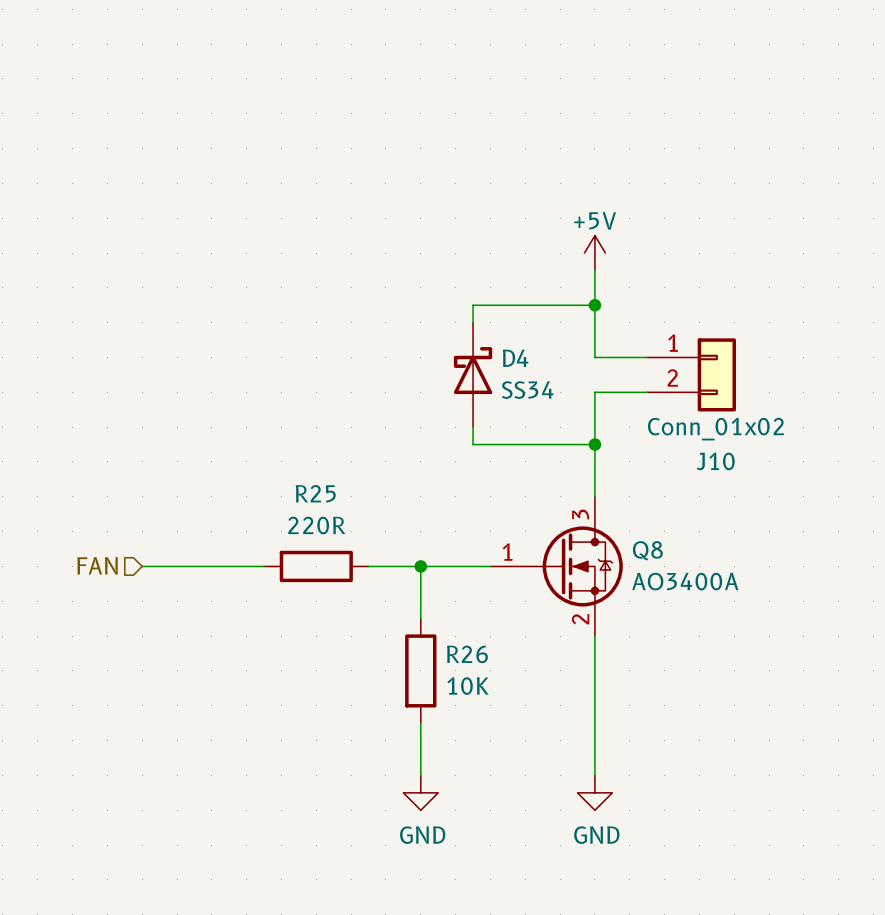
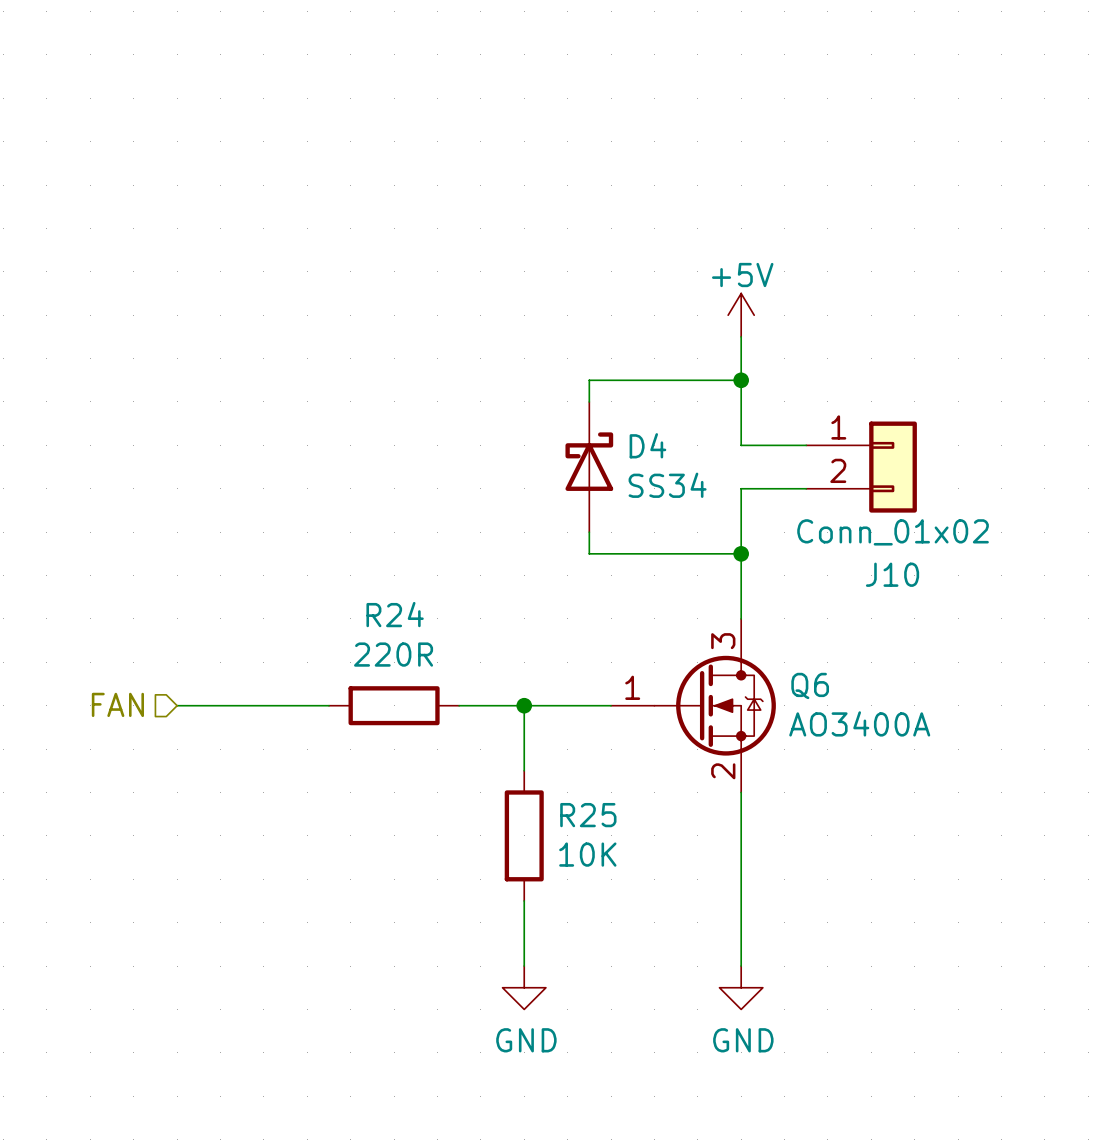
R25 name: R25 (315, 493) -> R24 (395, 614)
Q8 name: Q8 (647, 550) -> Q6 (810, 685)
R26 name: R26 (467, 654) -> R25 (588, 815)

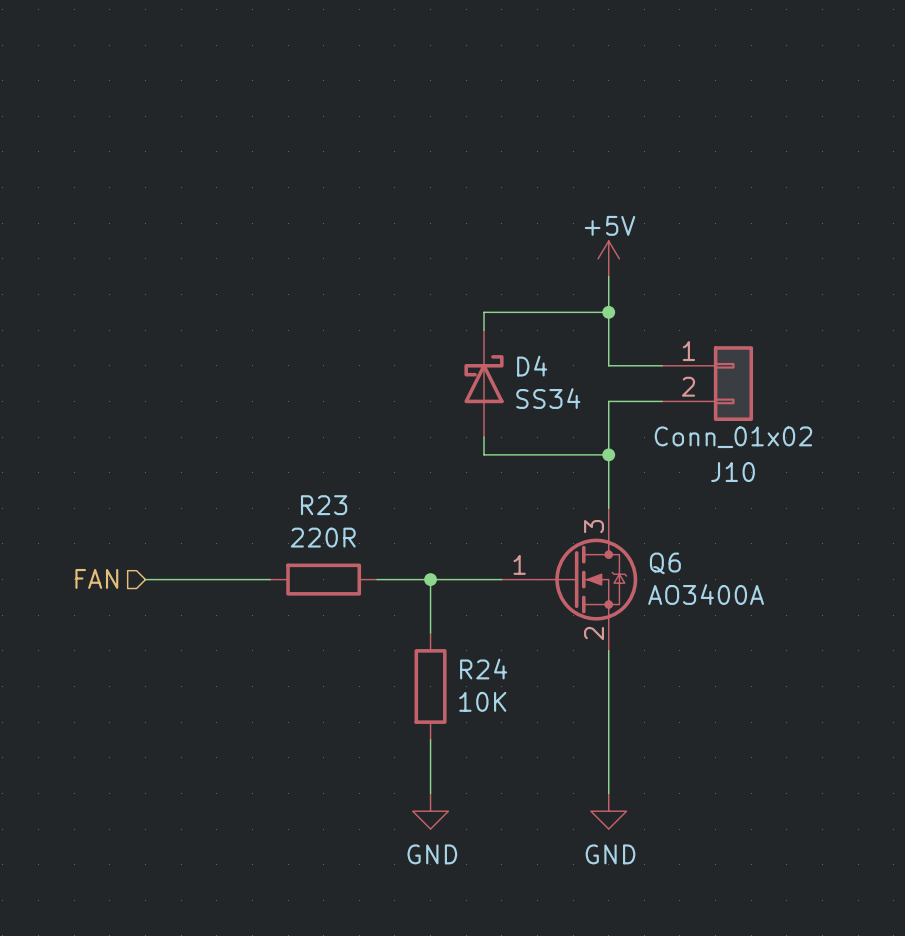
R24 name: R24 (395, 614) -> R23 (324, 505)
R25 name: R25 (588, 815) -> R24 (483, 669)

